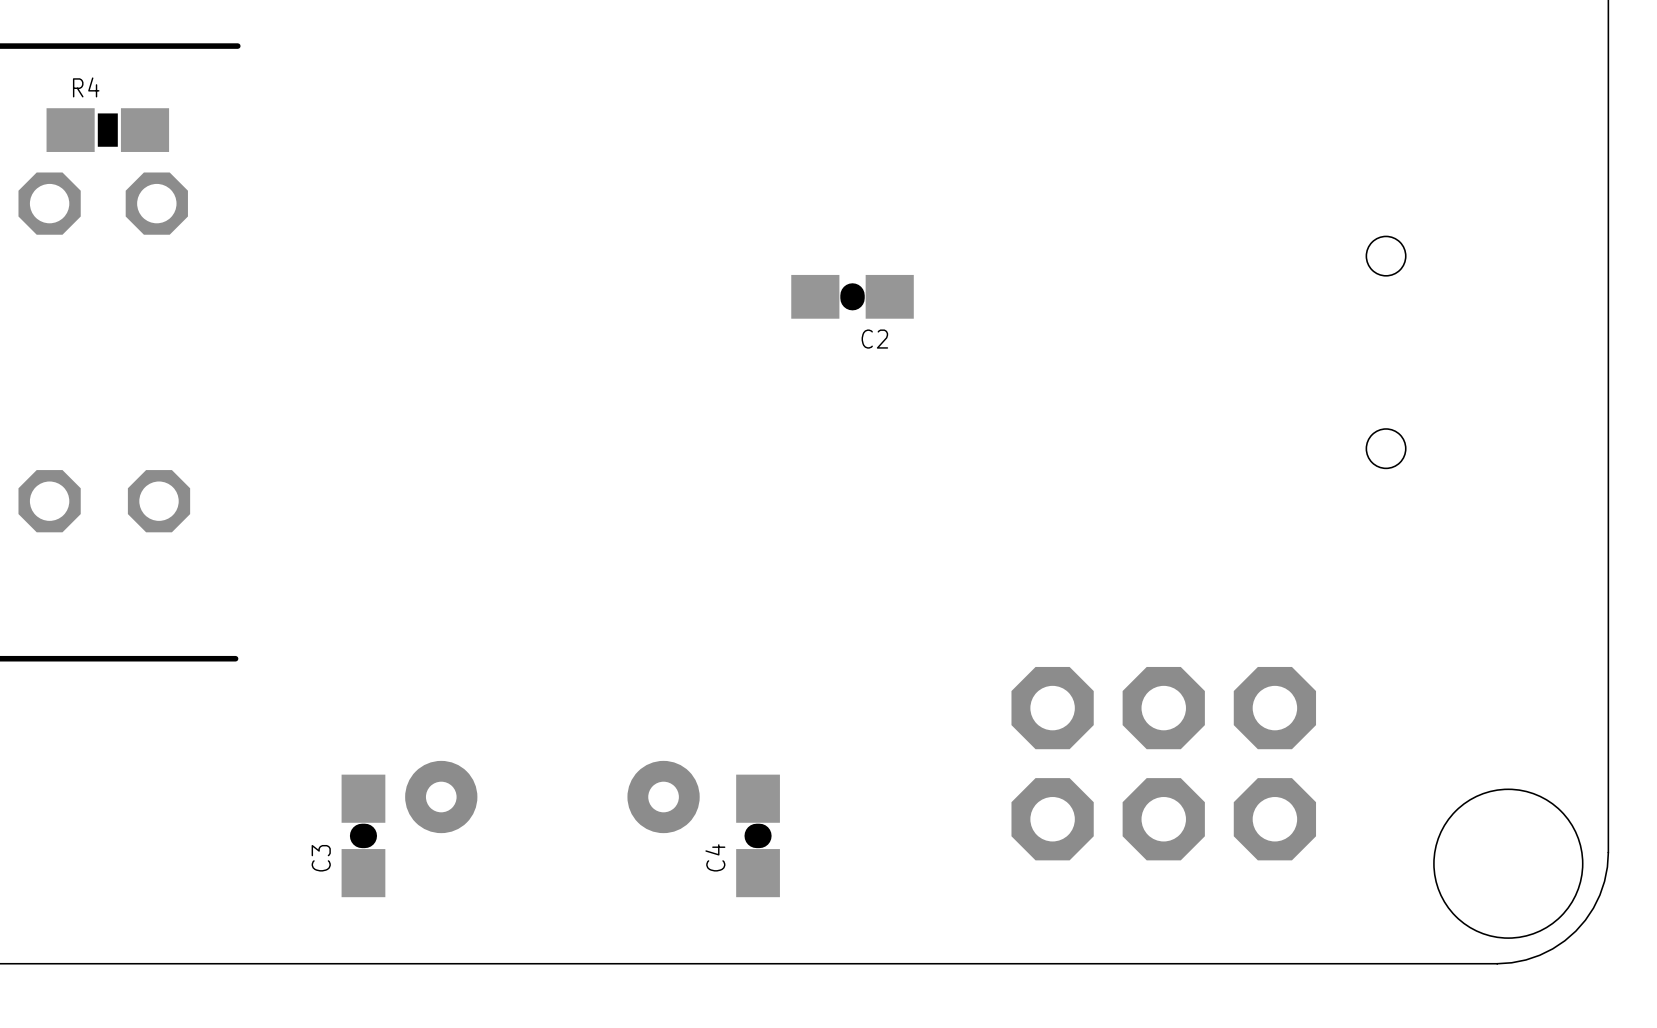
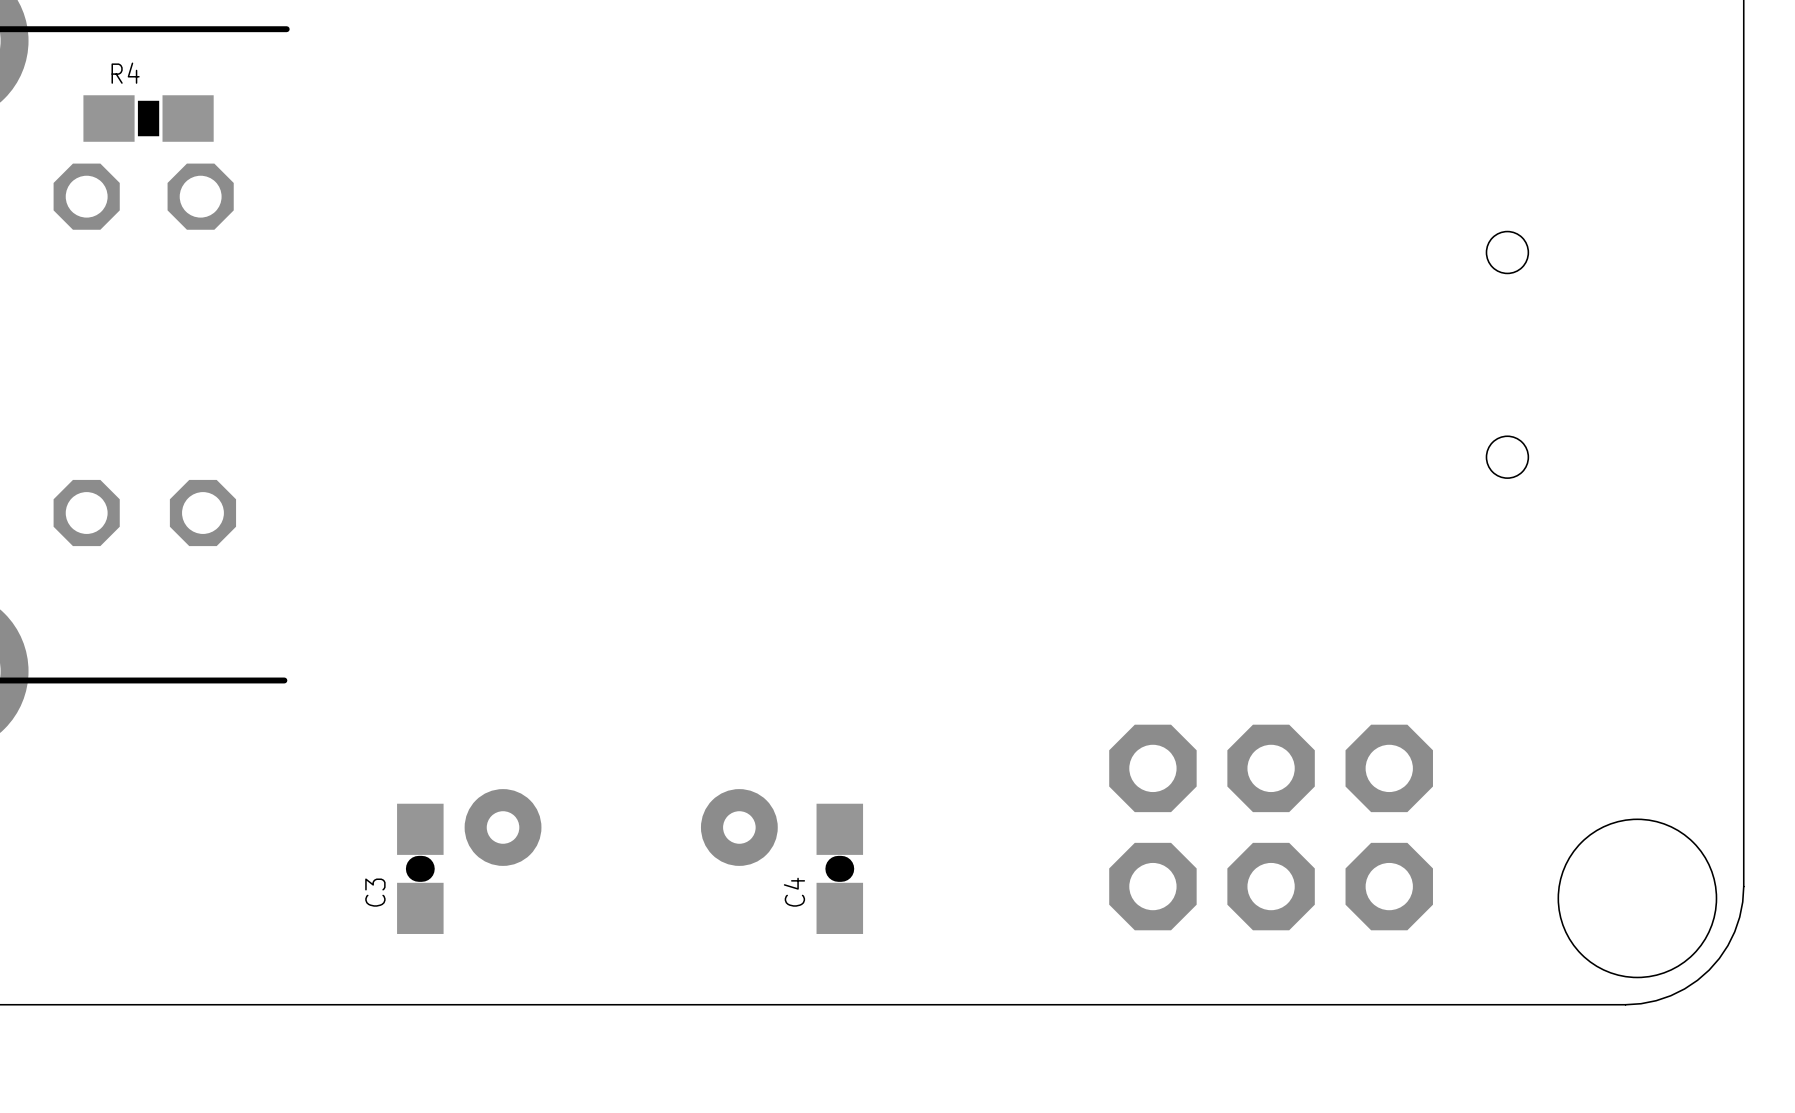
C2: (852, 296) -> none
part position: (1163, 763) -> (1271, 827)

